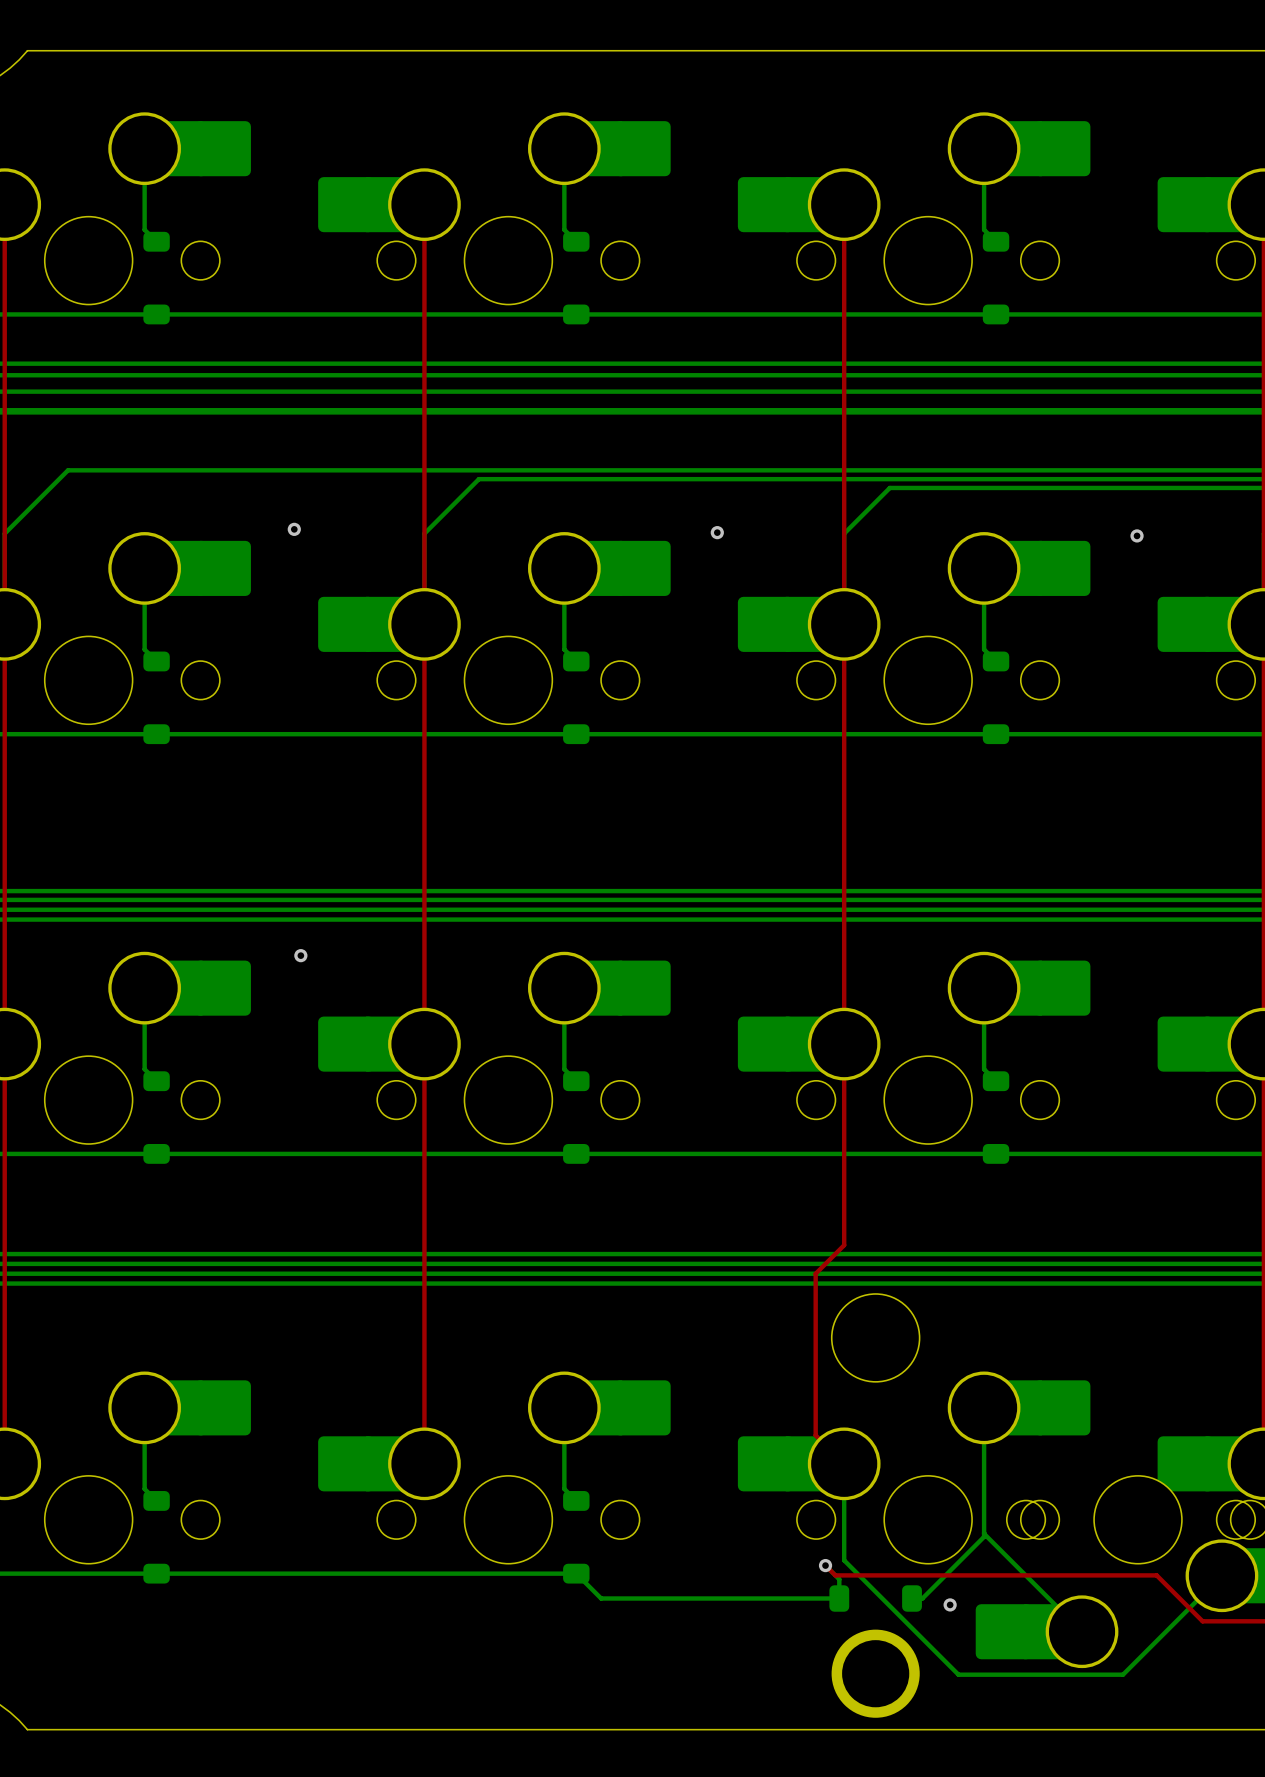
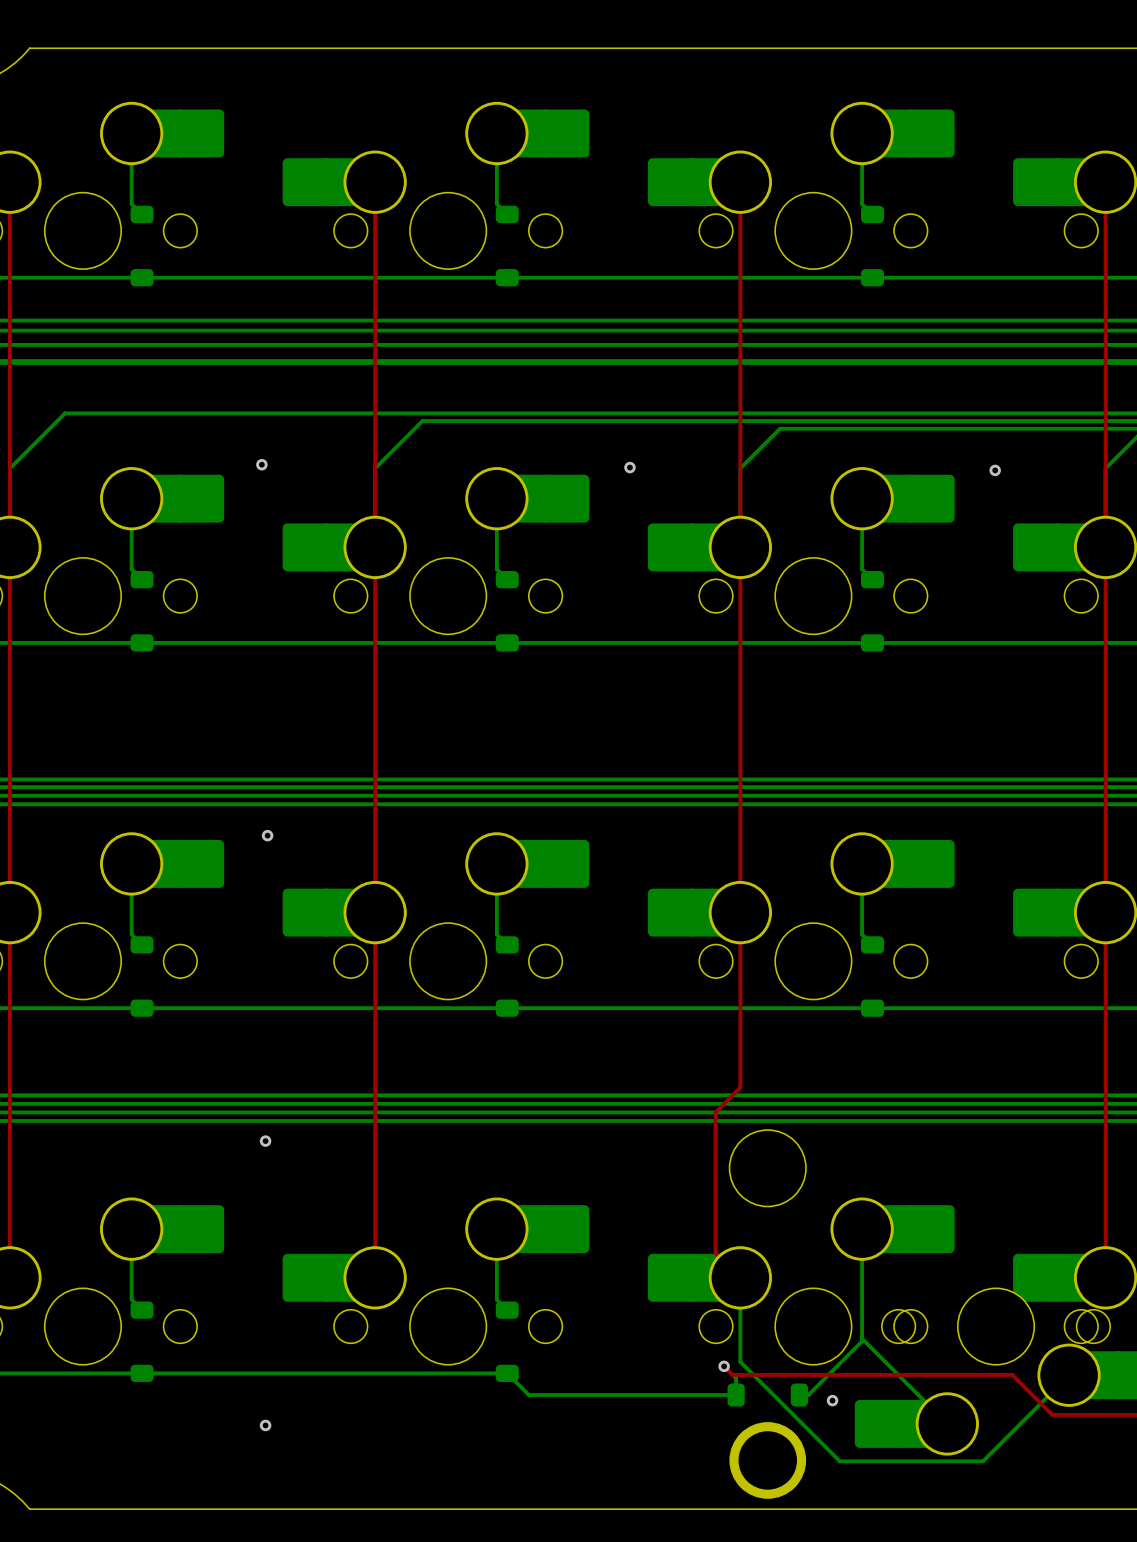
via: none -> (265, 1141)
via: none -> (265, 1425)

